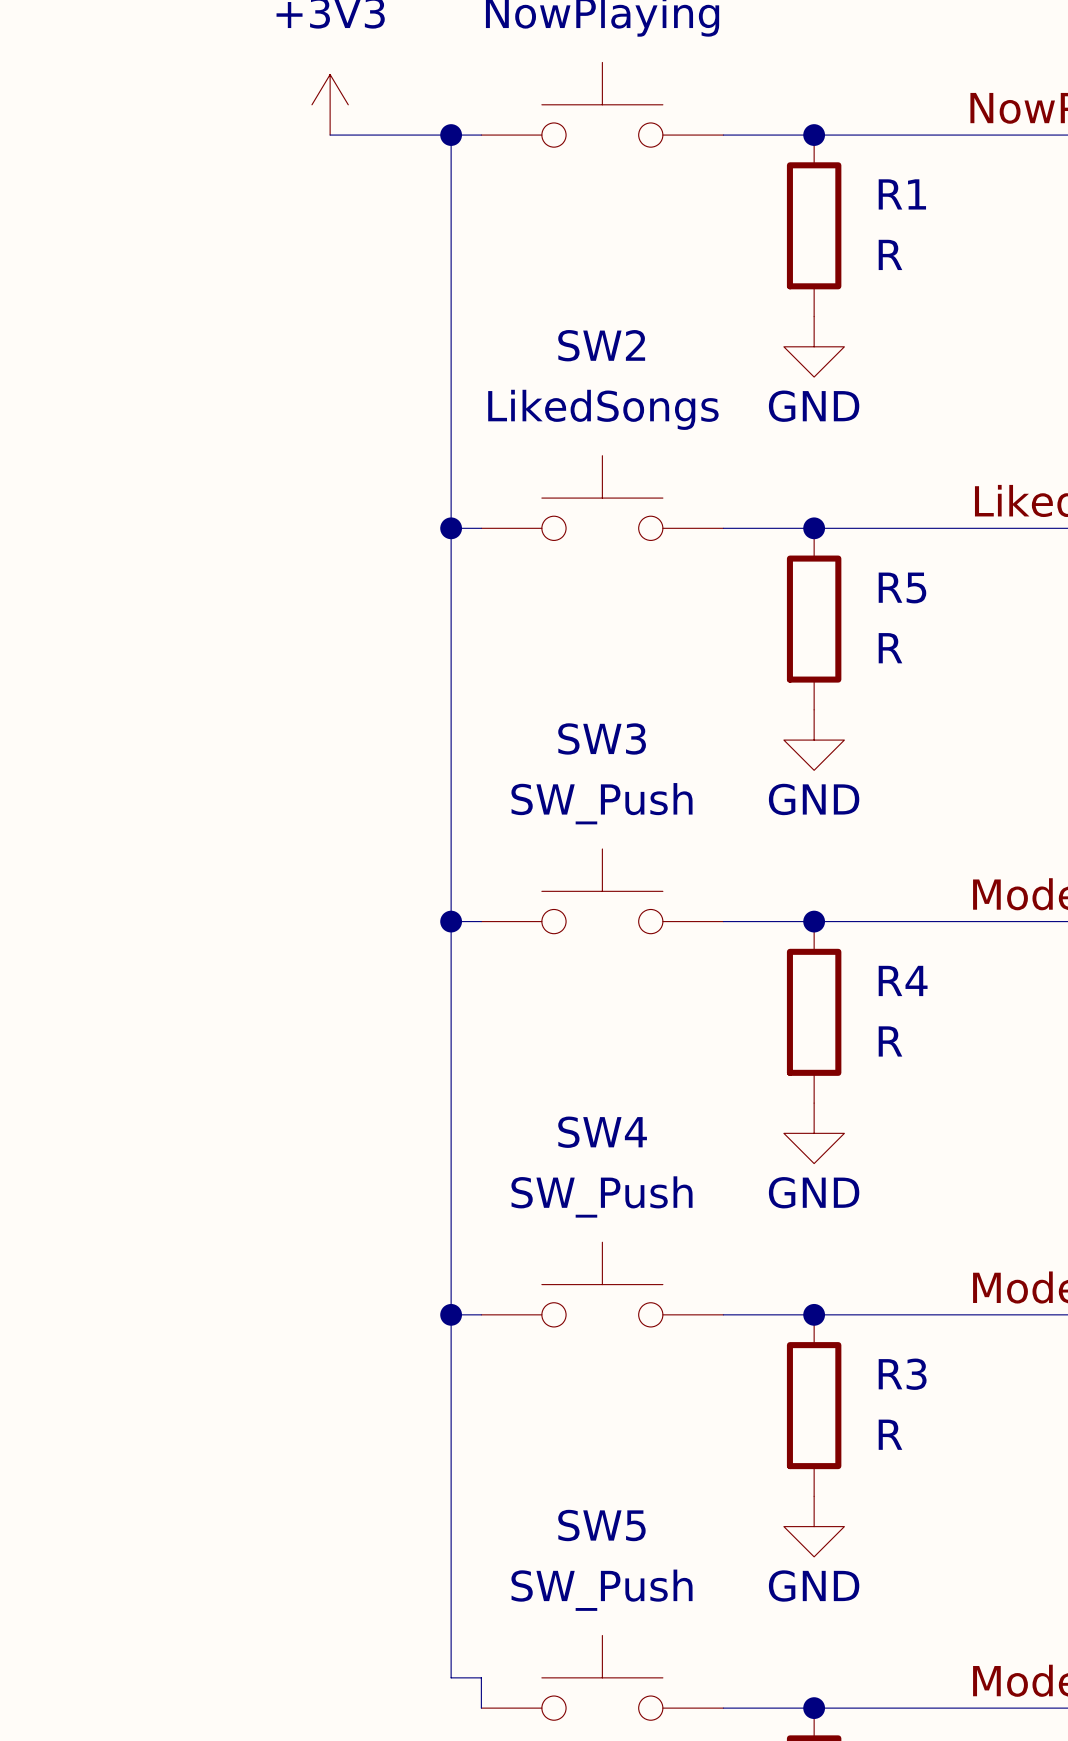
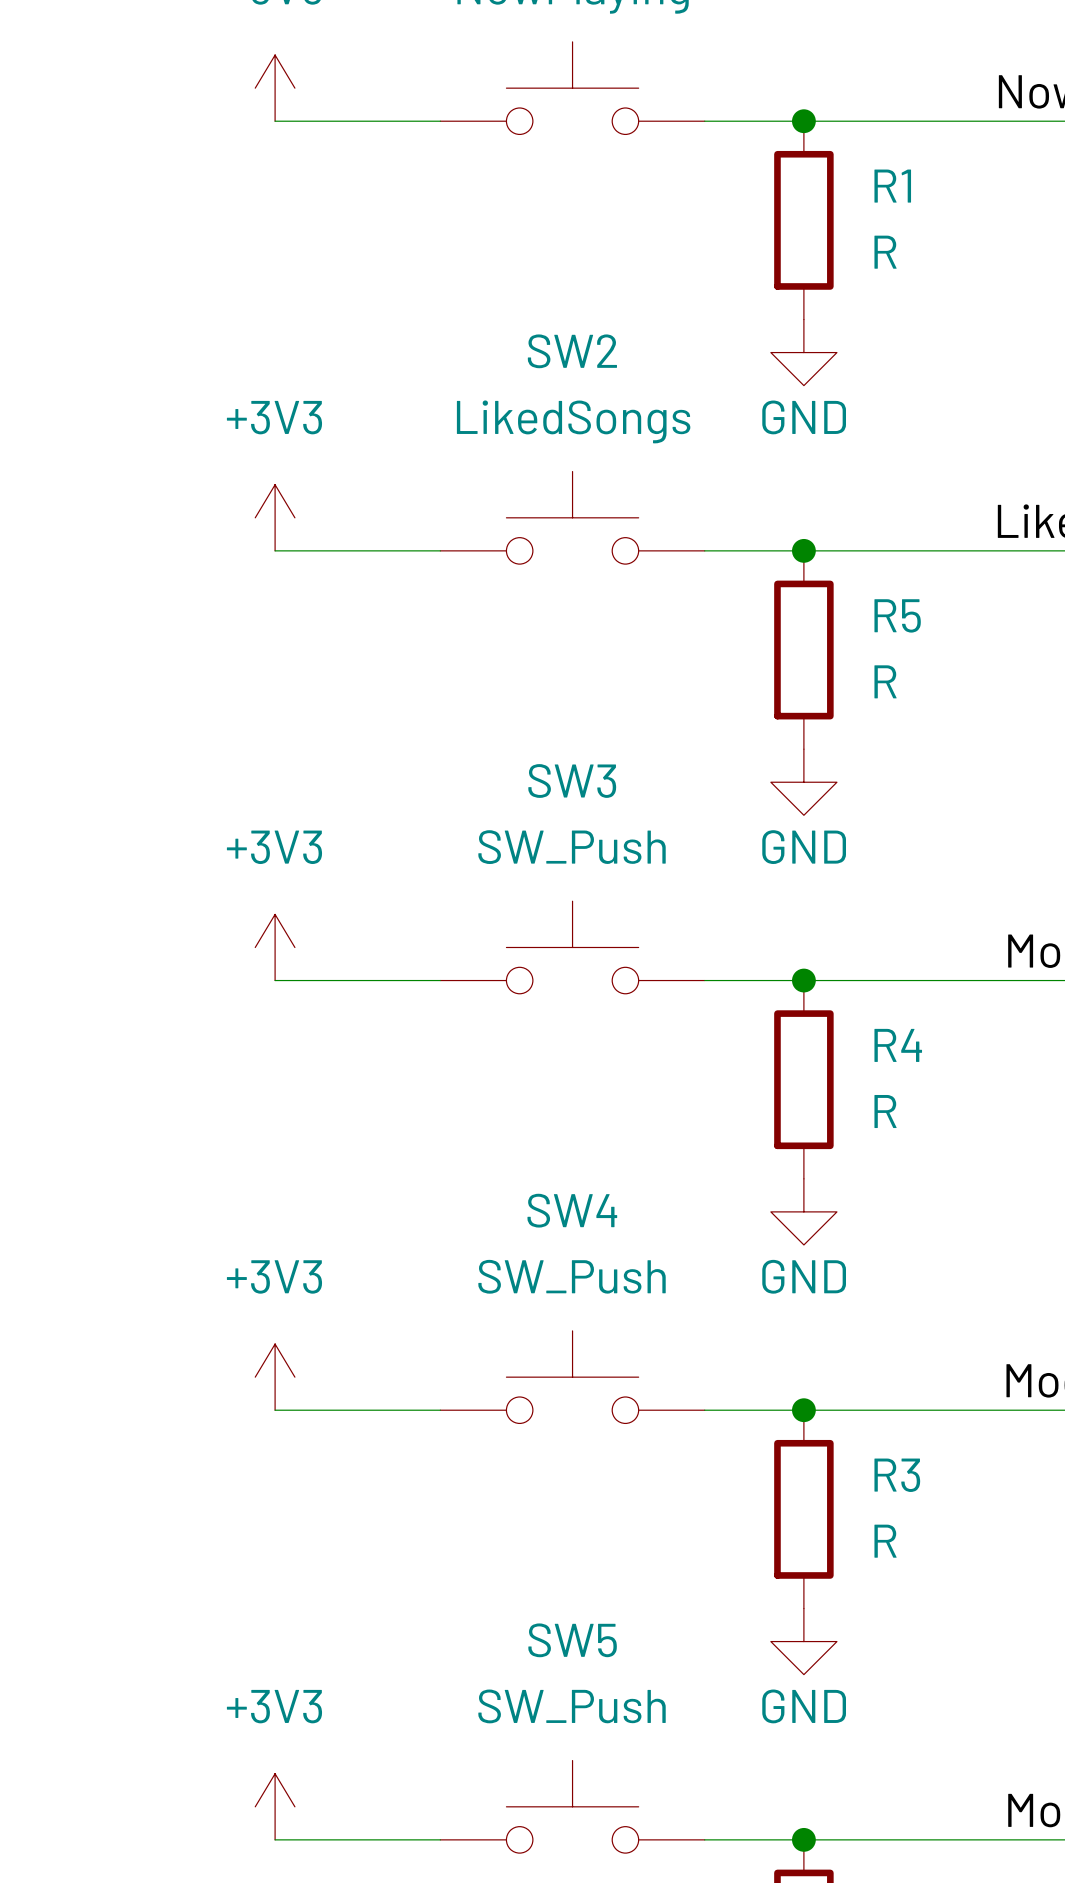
wire: (451, 135) (451, 1677) (481, 1677) (481, 1708) -> (275, 1839) (440, 1839)
junction: (451, 135) -> none
power symbol: none -> +3V3 (275, 517)
wire: none -> (275, 550) (407, 550)
junction: (451, 528) -> none
power symbol: none -> +3V3 (275, 947)
wire: none -> (275, 980) (407, 980)
junction: (451, 921) -> none
power symbol: none -> +3V3 (275, 1377)
wire: none -> (275, 1410) (407, 1410)
junction: (451, 1314) -> none
power symbol: none -> +3V3 (275, 1806)

